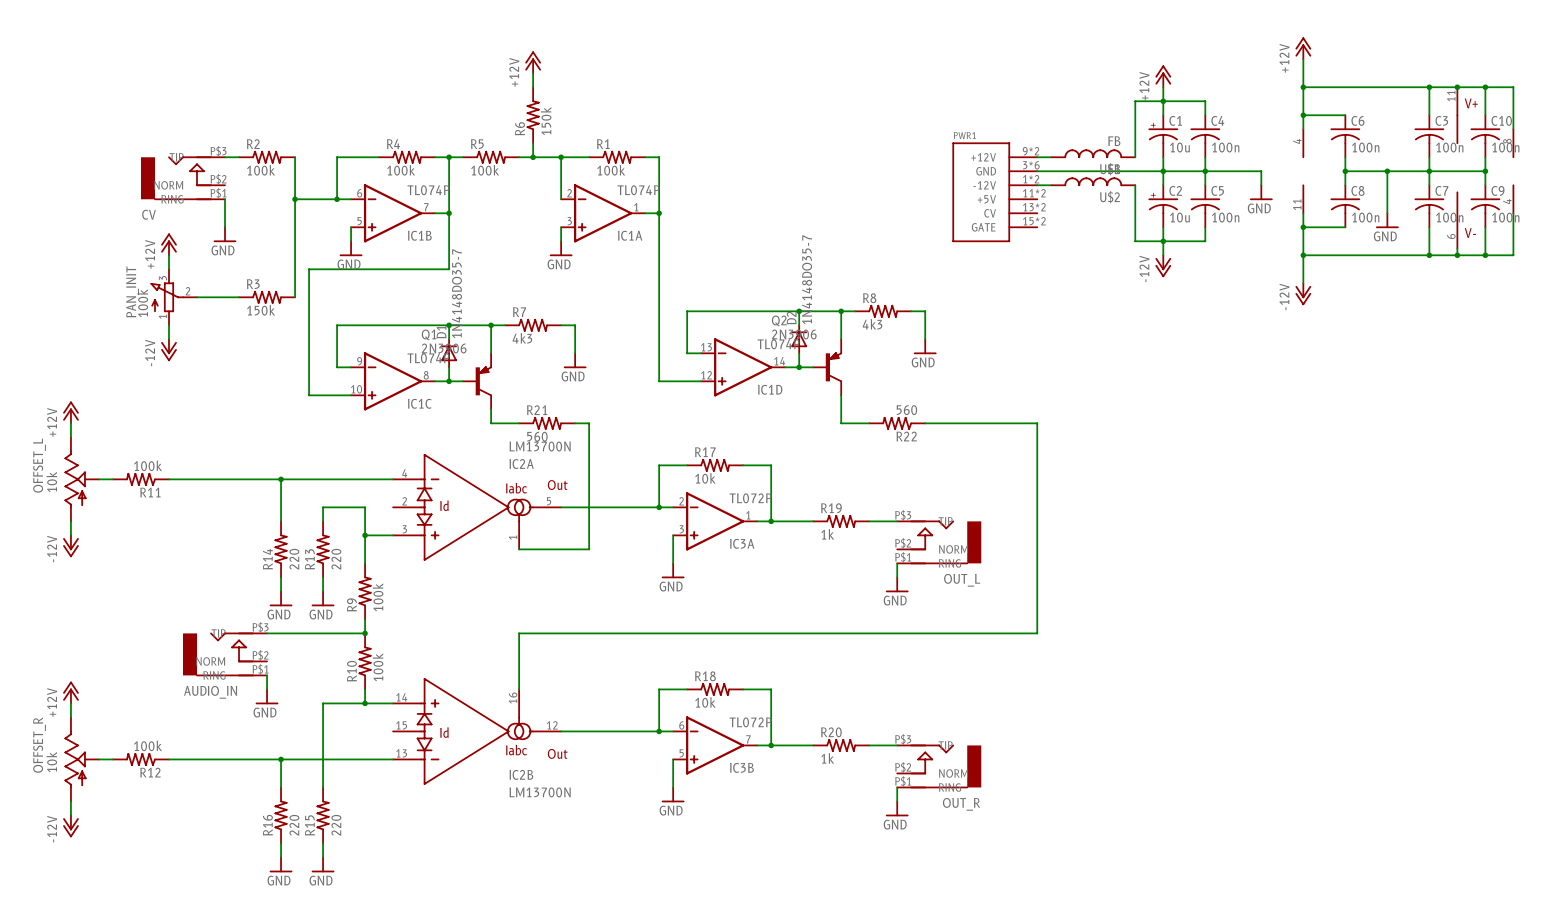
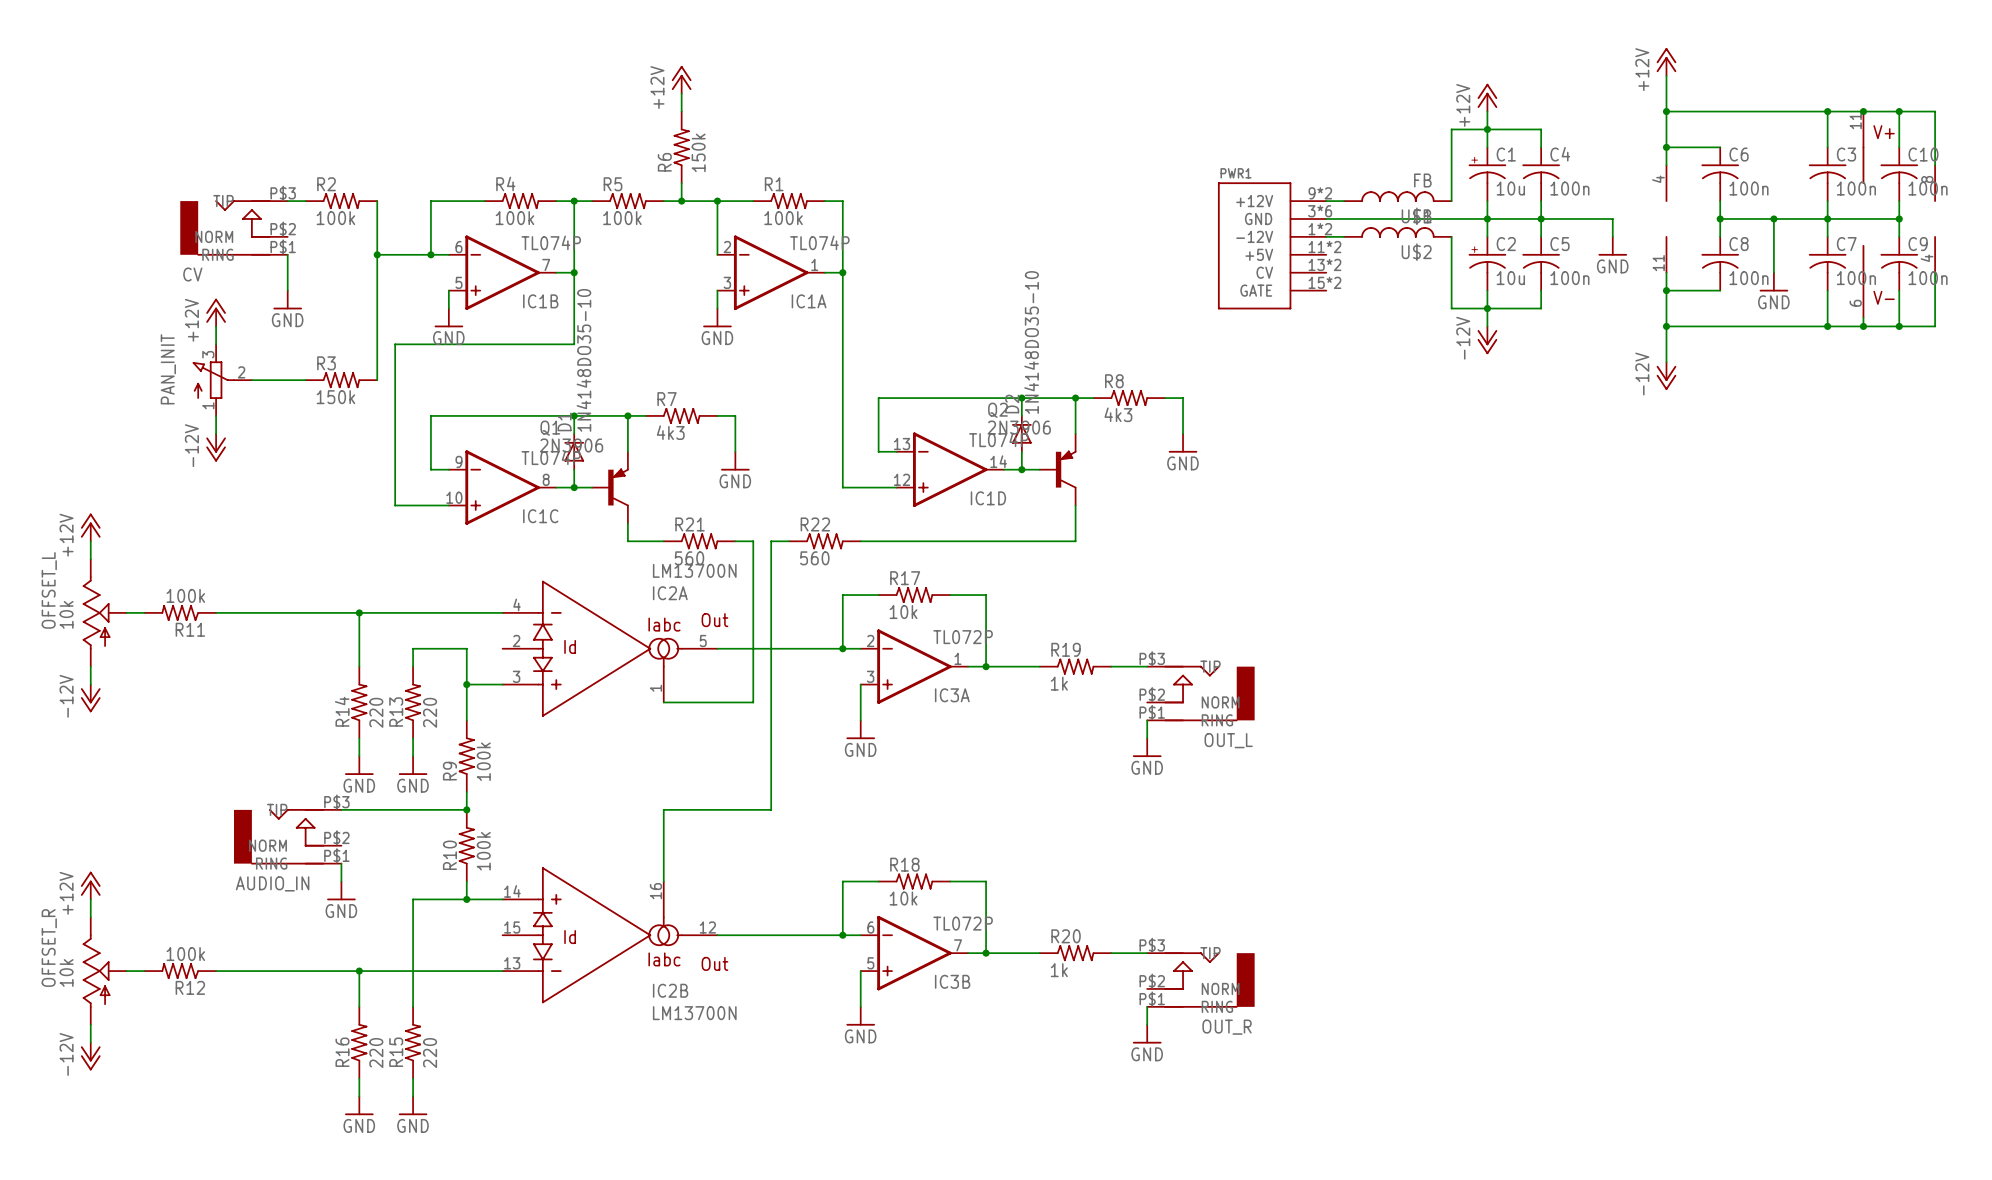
D2 value: 1N4148DO35-7 (807, 279) -> 1N4148DO35-10 (1031, 342)
D1 value: 1N4148DO35-7 (456, 293) -> 1N4148DO35-10 (583, 360)
PAN_INIT value: 100k (142, 303) -> none
wire: (841, 423) (869, 423) -> (1075, 541) (860, 541)
R22 rotation: 0° (897, 423) -> 180° (824, 541)
R22 position: (897, 423) -> (824, 541)
wire: (925, 423) (1037, 423) (1037, 633) (603, 633) -> (789, 541) (771, 541) (771, 809)

